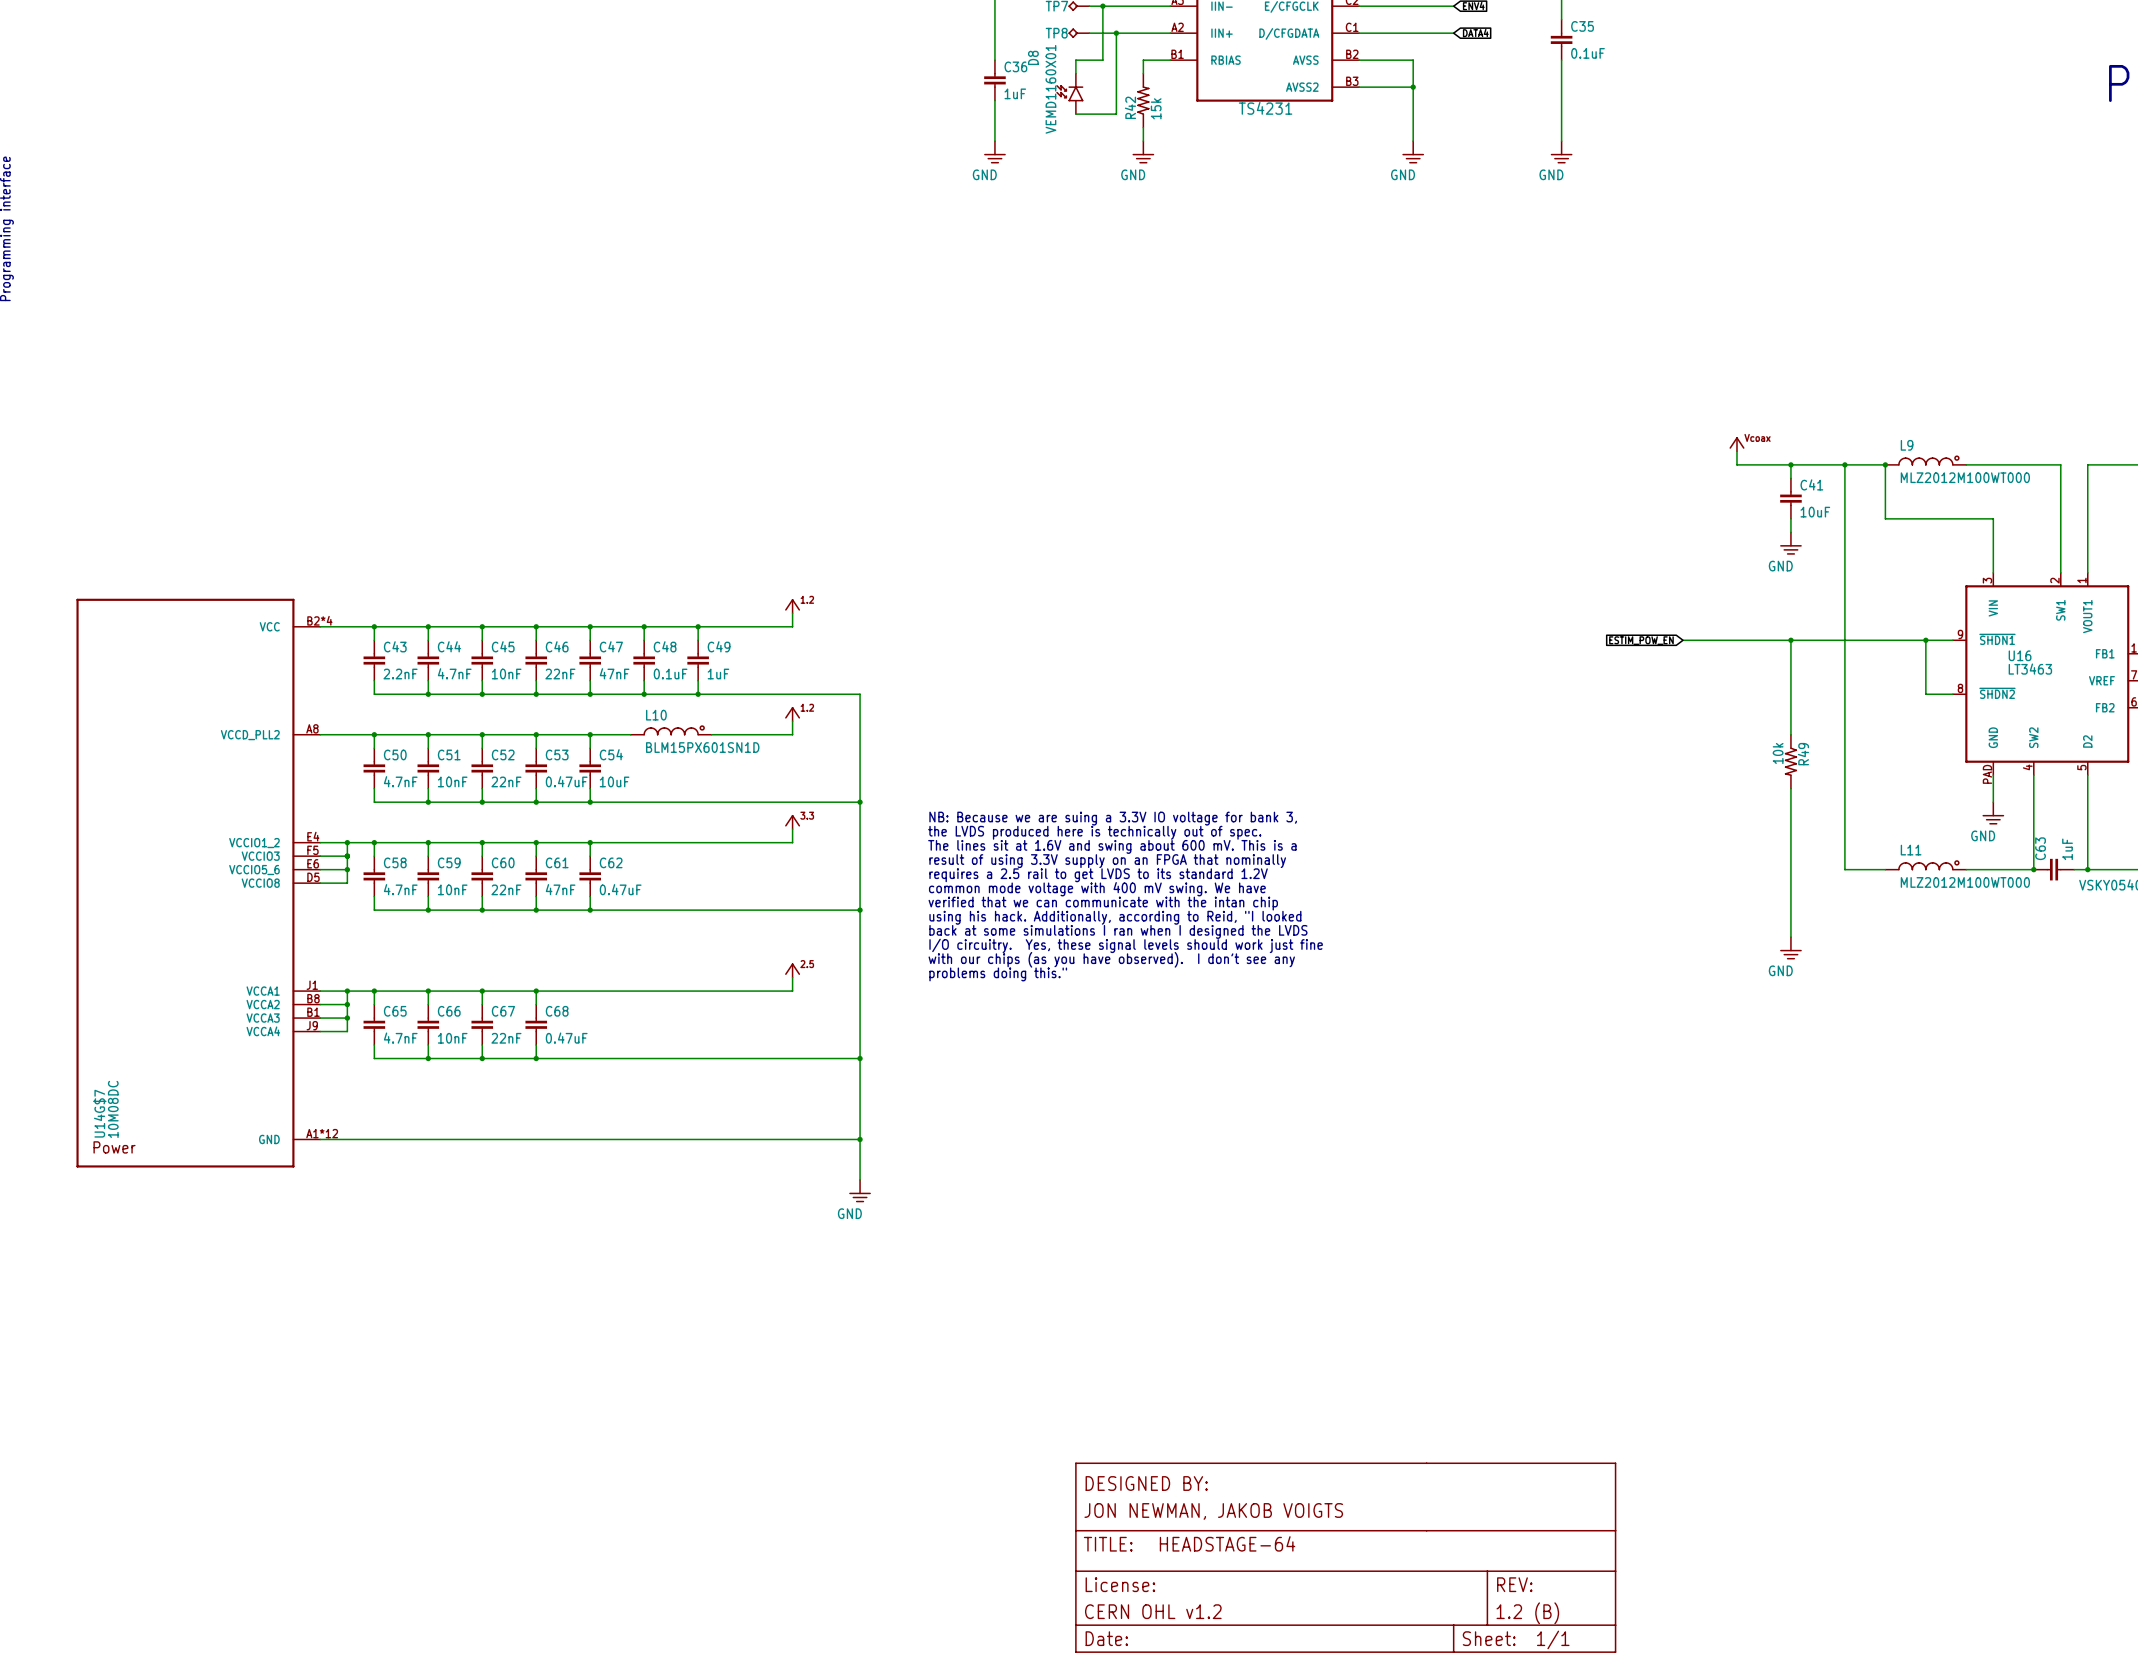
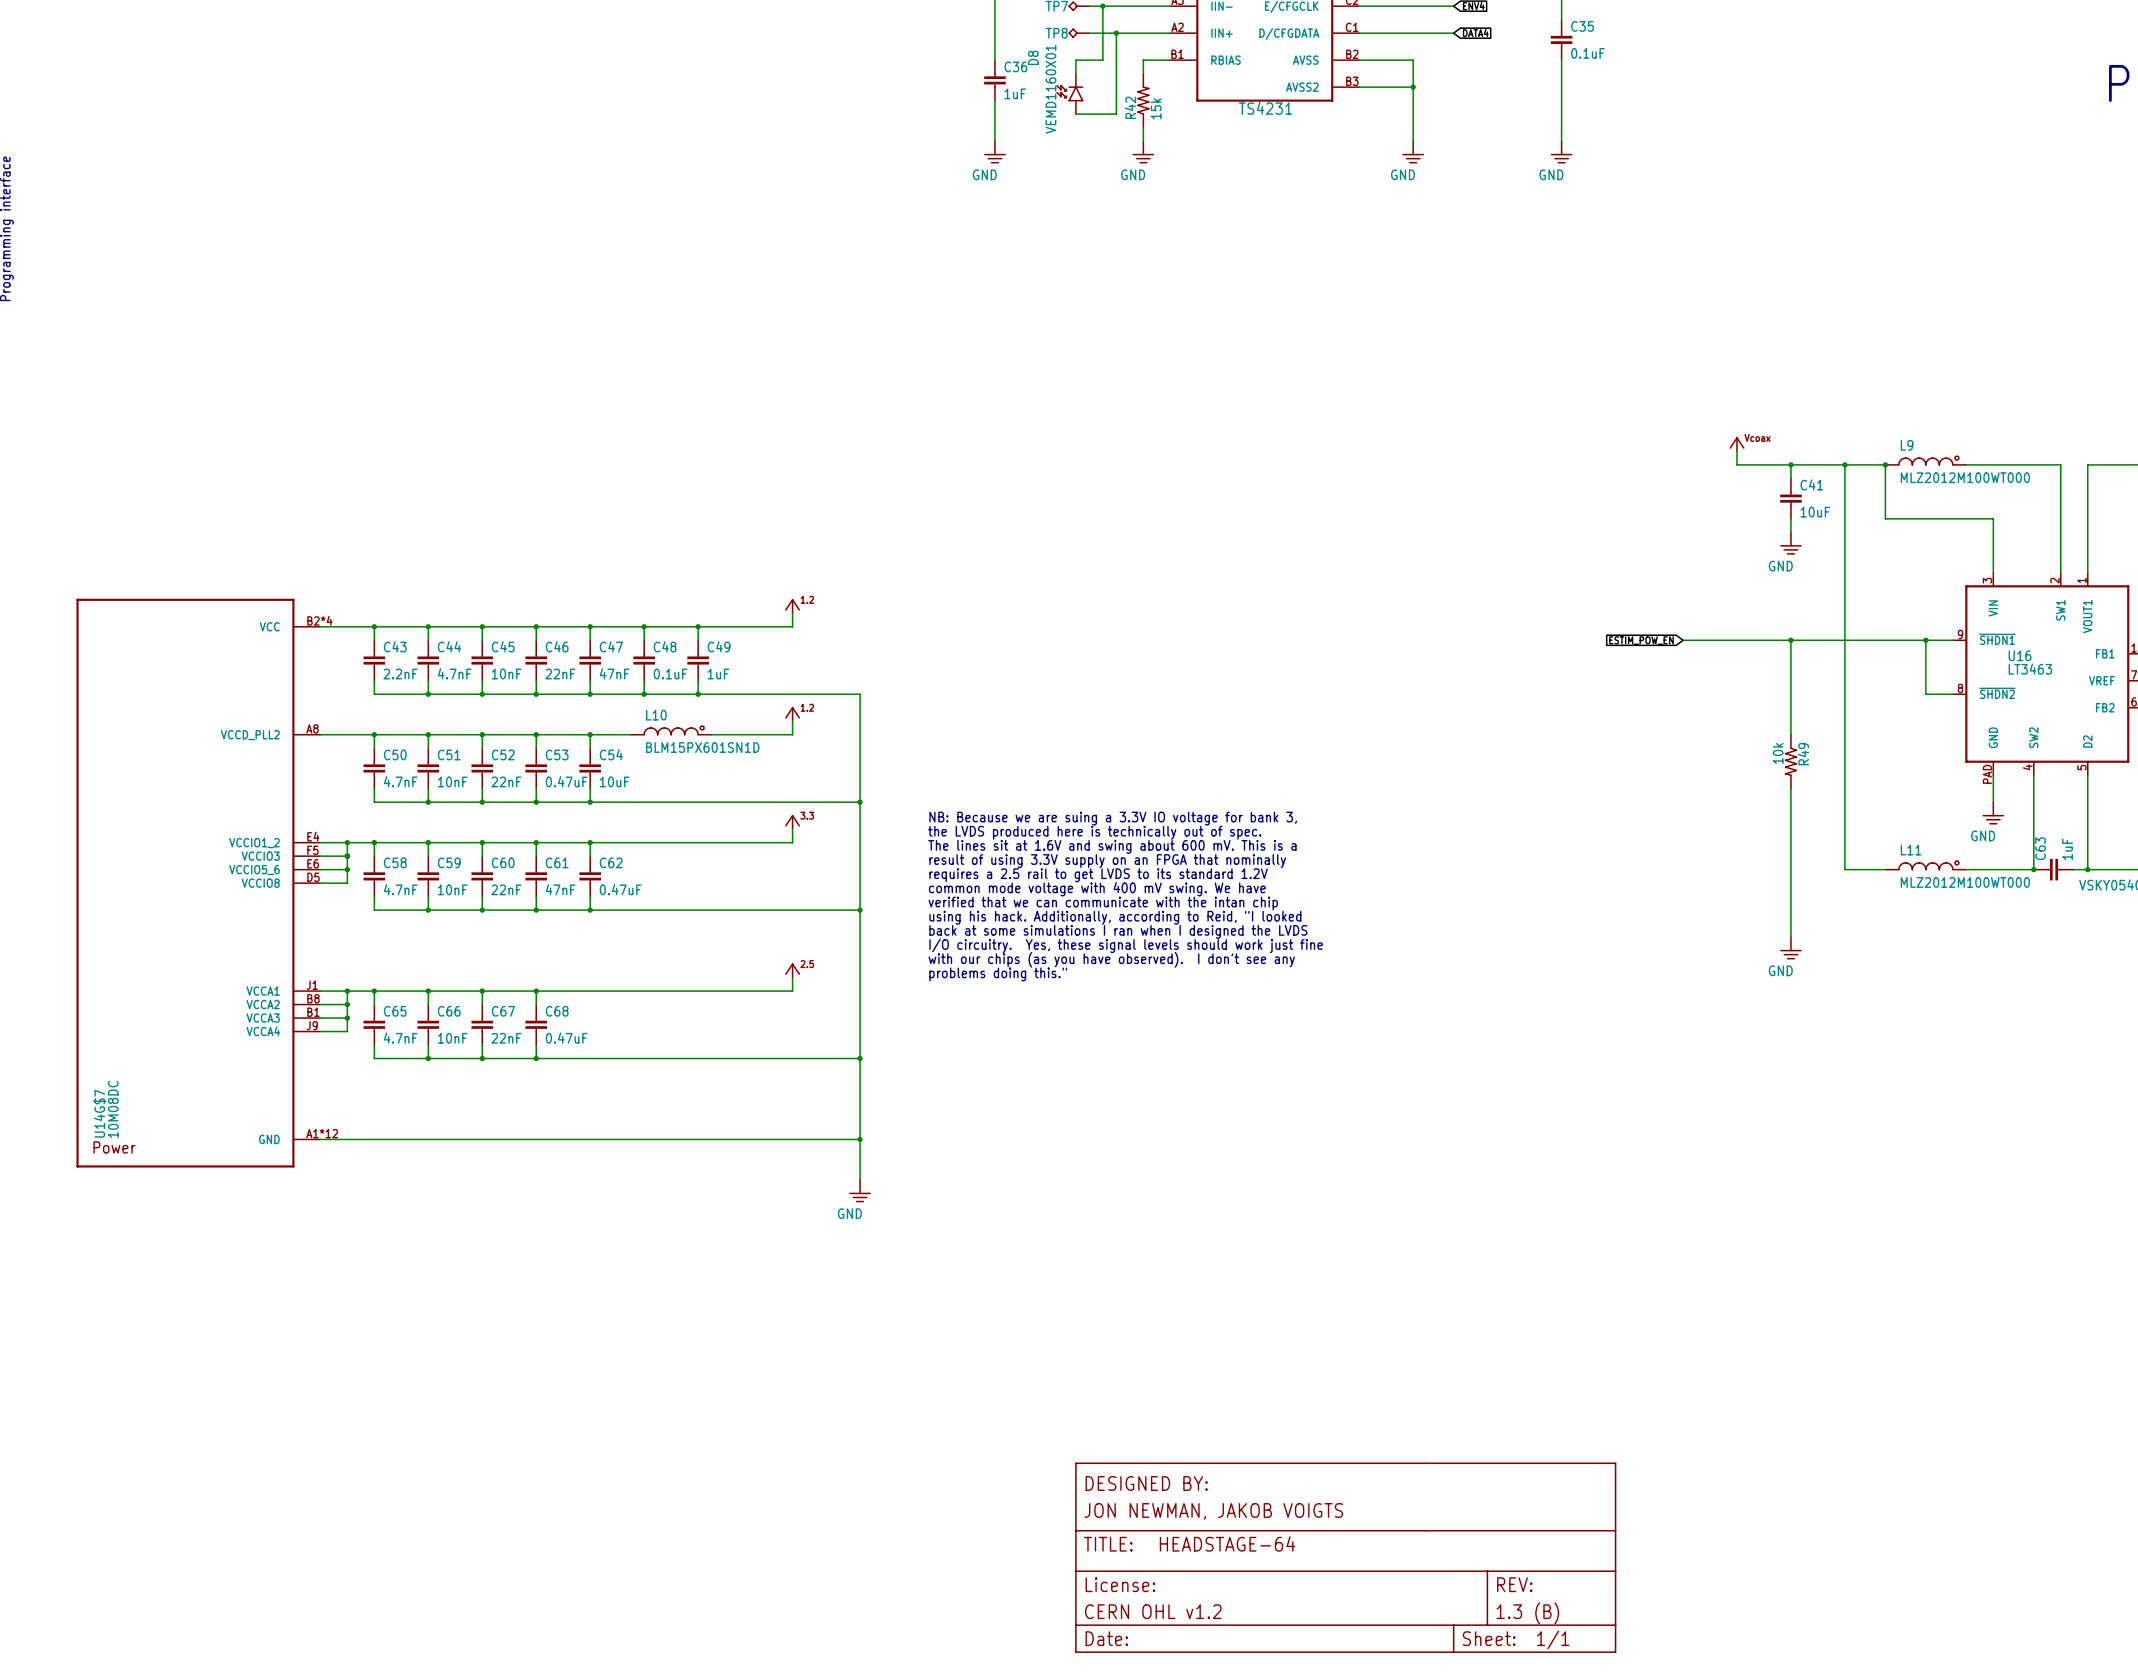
part text: 1.2 (B) (1527, 1613) -> 1.3 (B) (1527, 1613)

